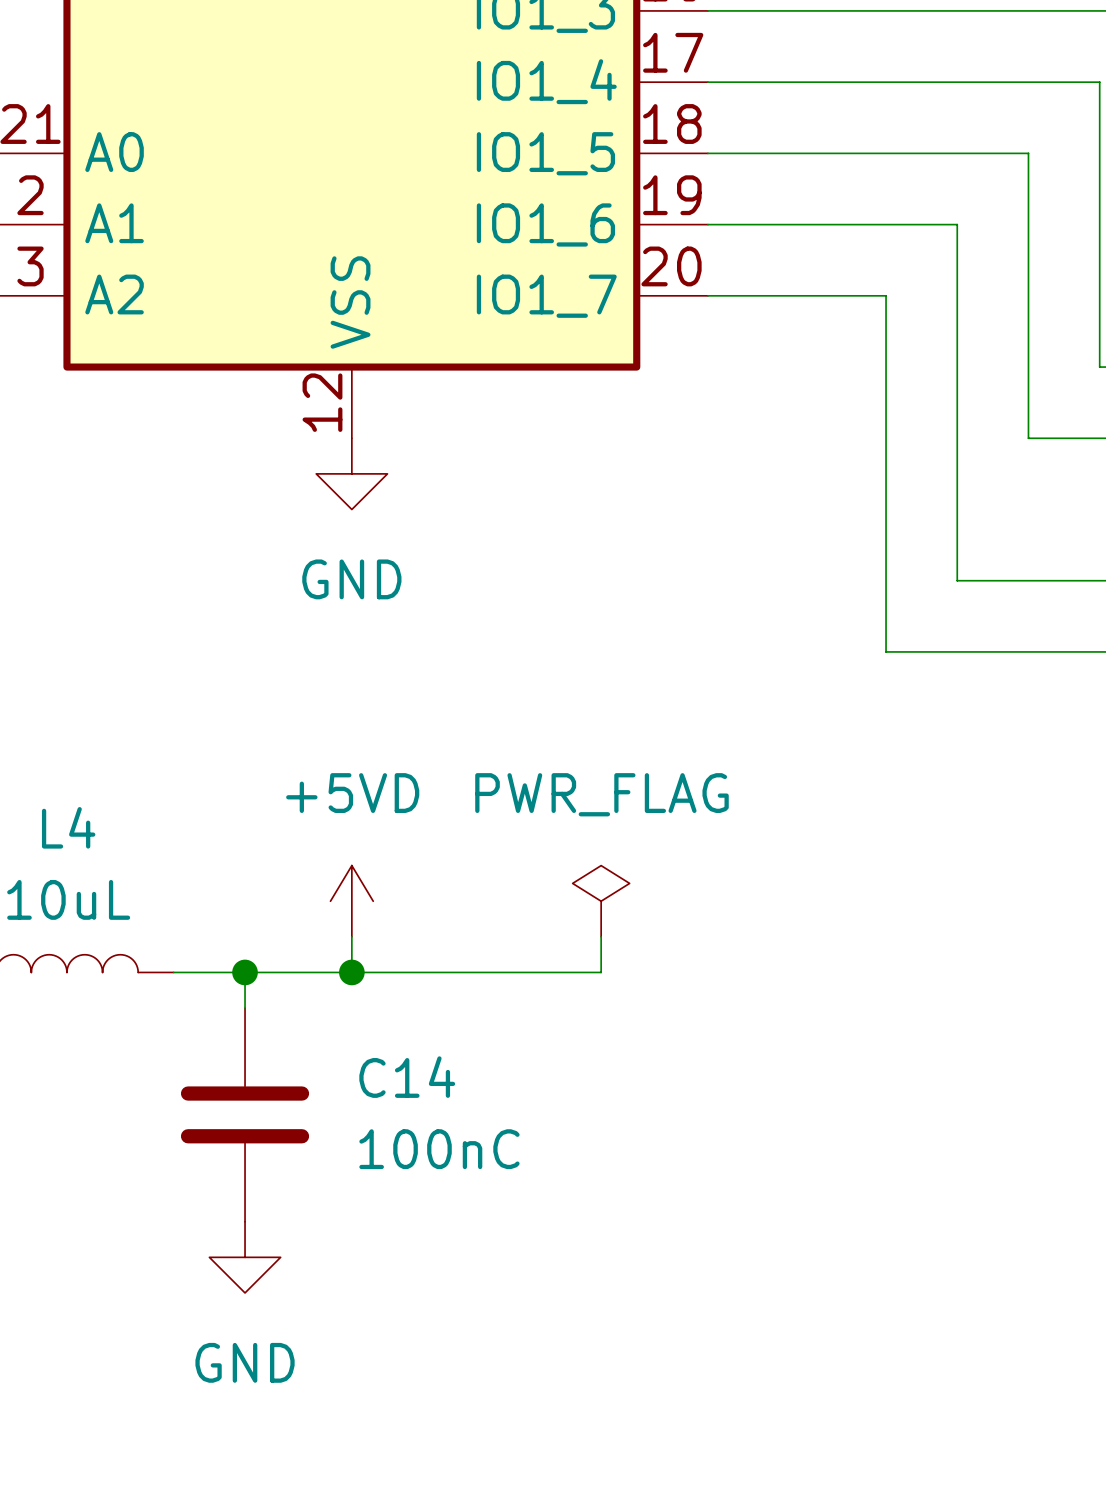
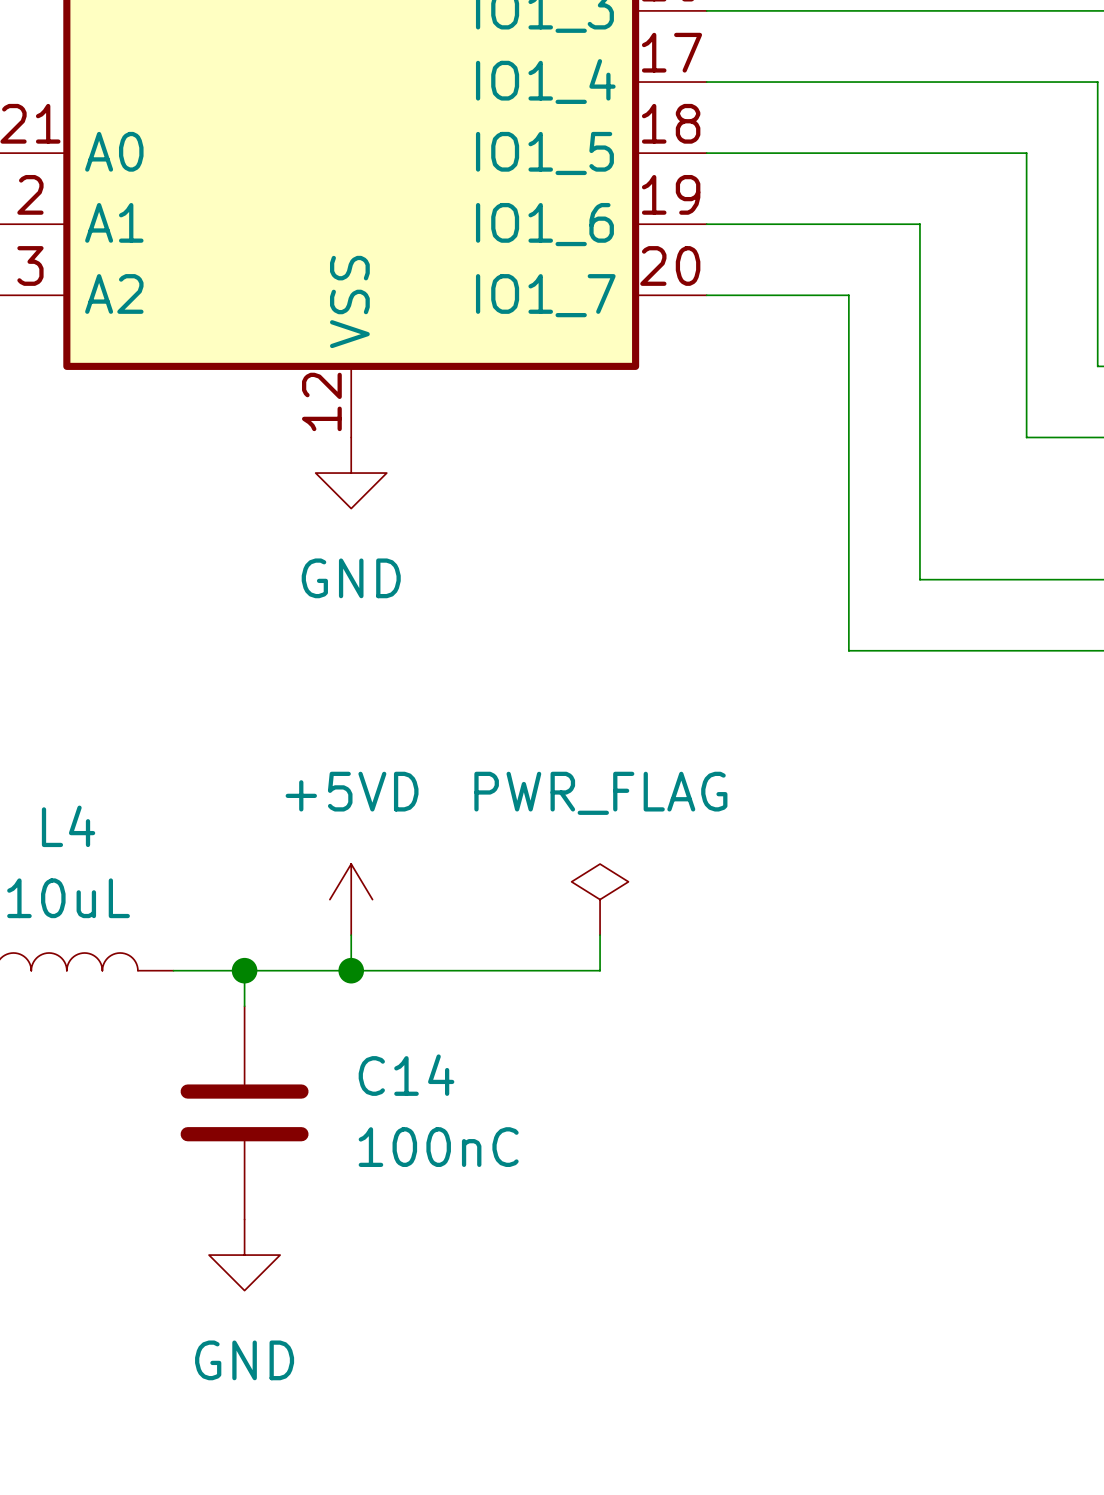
wire: (921, 224) (957, 224) (957, 580) -> (919, 224) (919, 579) (955, 579)
wire: (850, 295) (886, 295) (886, 651) -> (848, 295) (848, 650) (884, 650)

